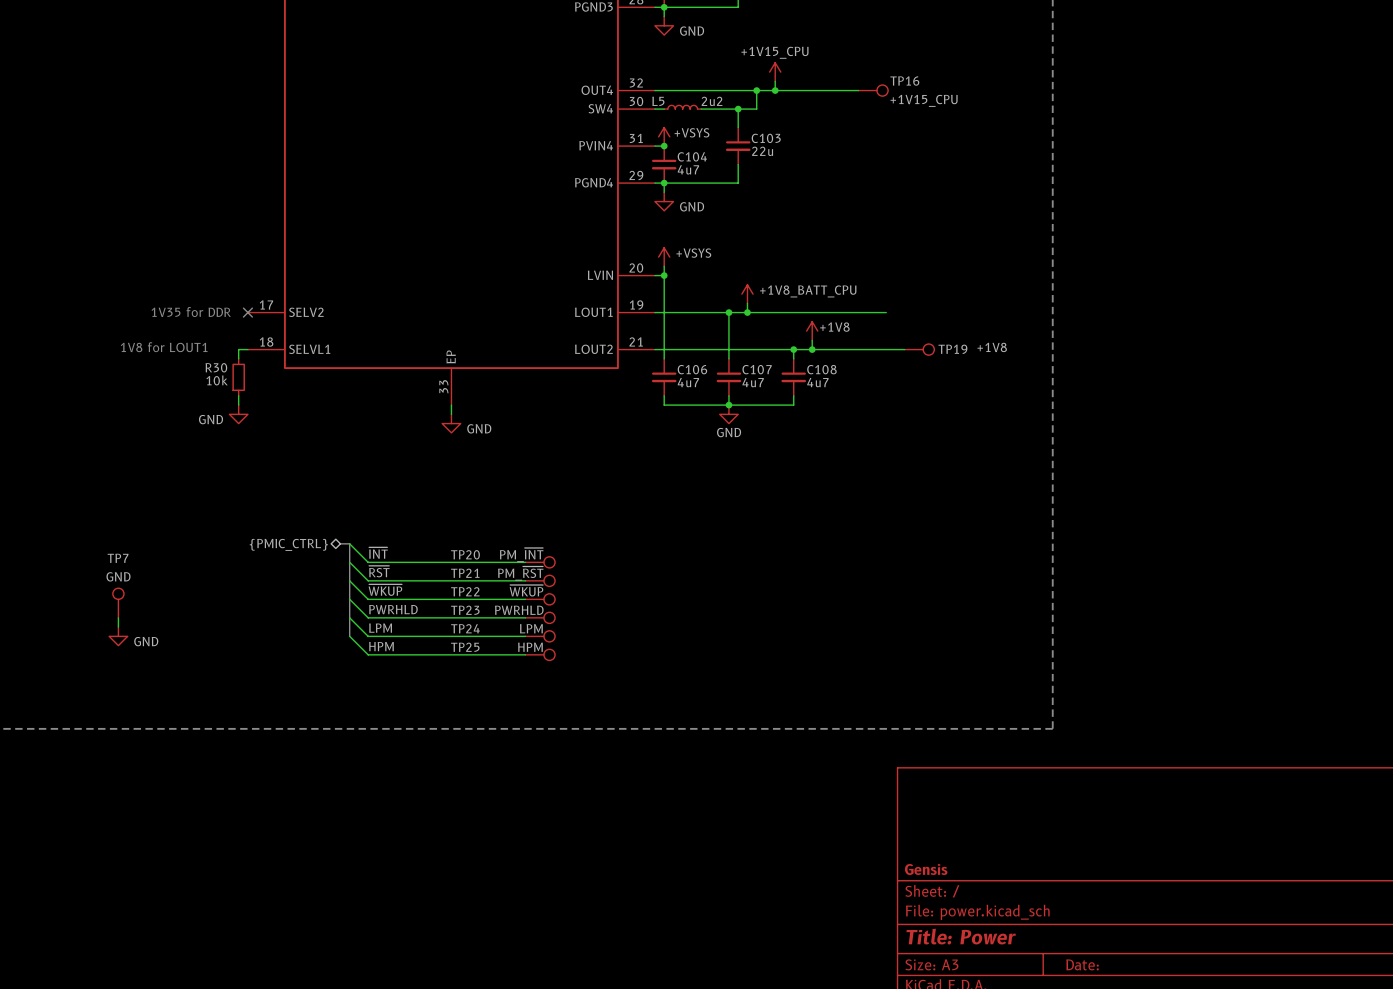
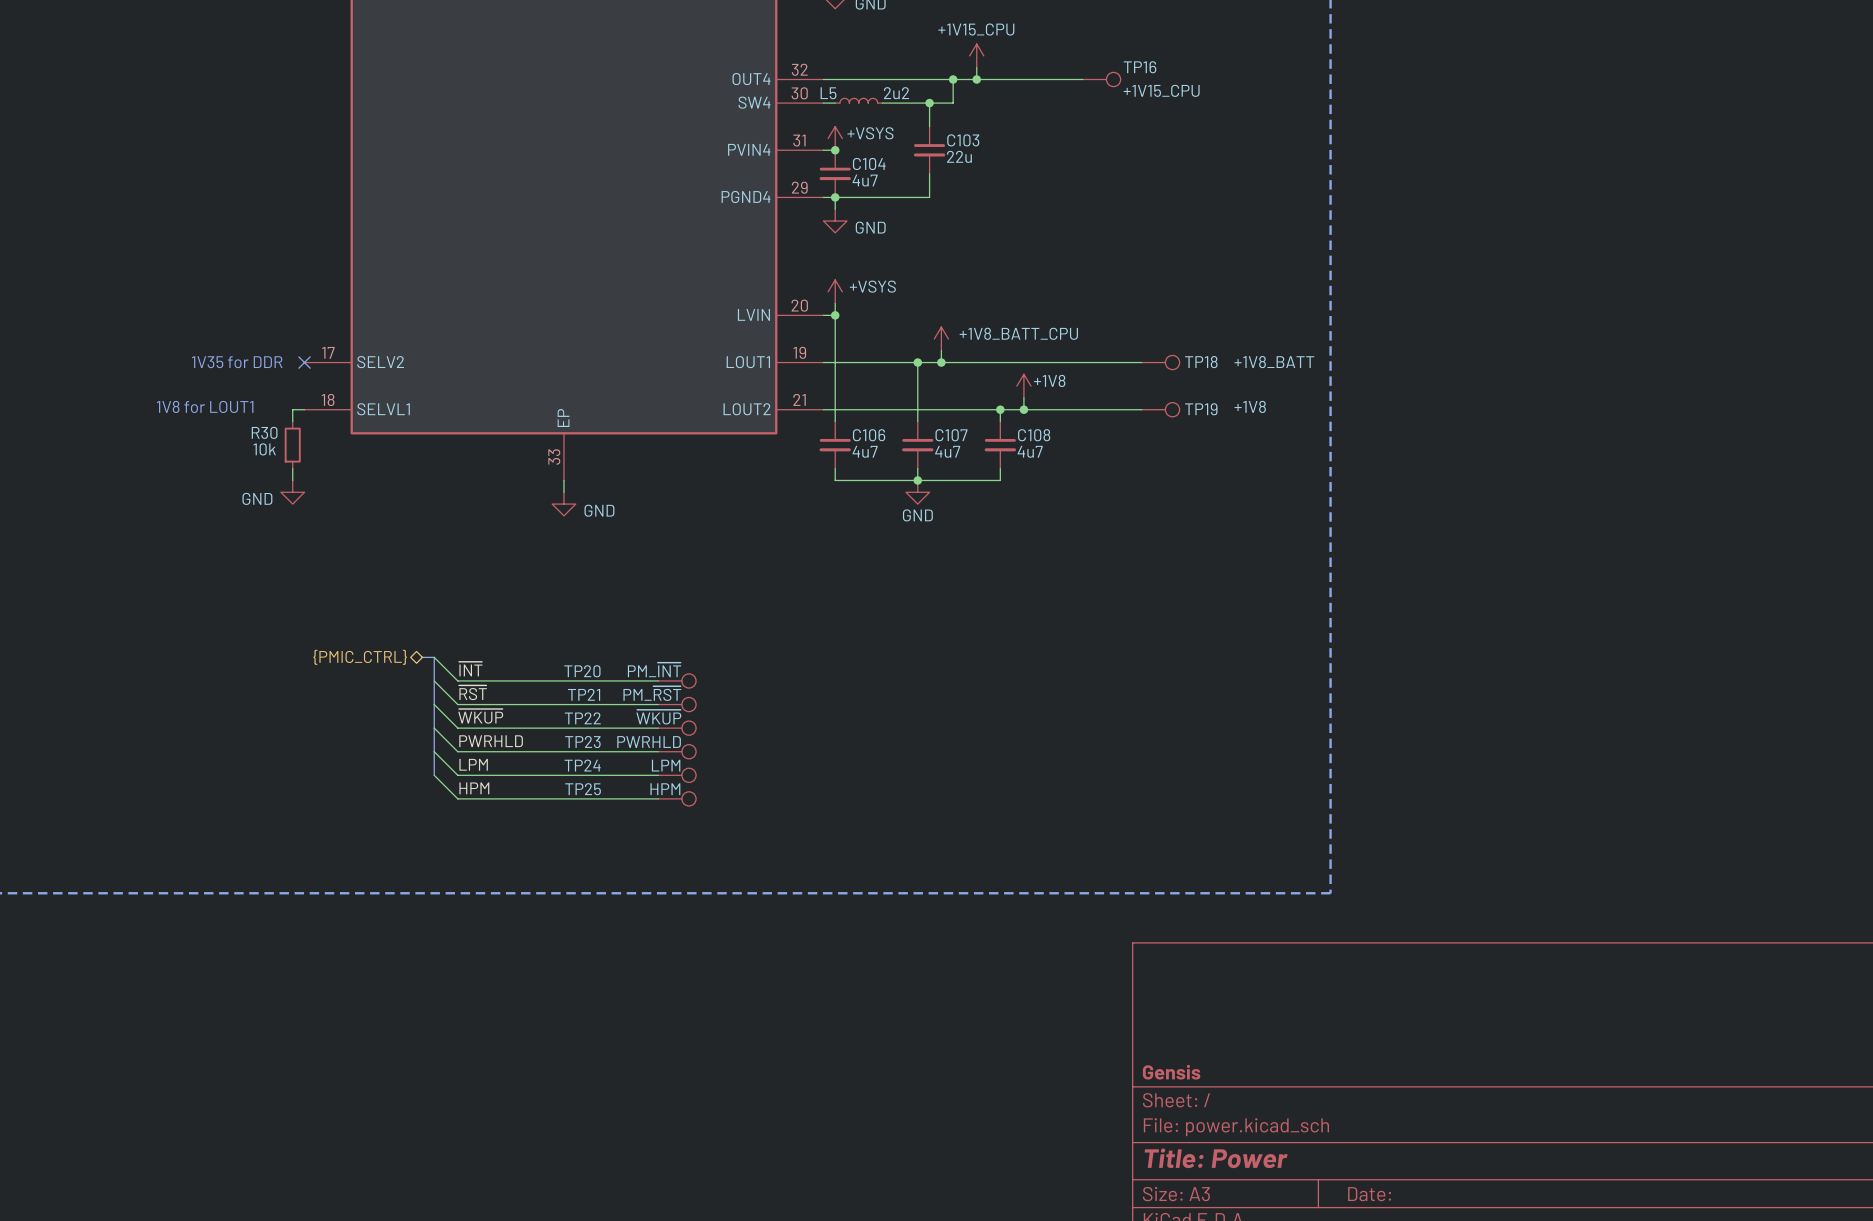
wire: none -> (1118, 362) (1141, 362)
TP18: none -> +1V8_BATT (1160, 362)
TP7: GND (118, 603) -> none
wire: (118, 617) (118, 627) -> none
power symbol: GND (118, 636) -> none

